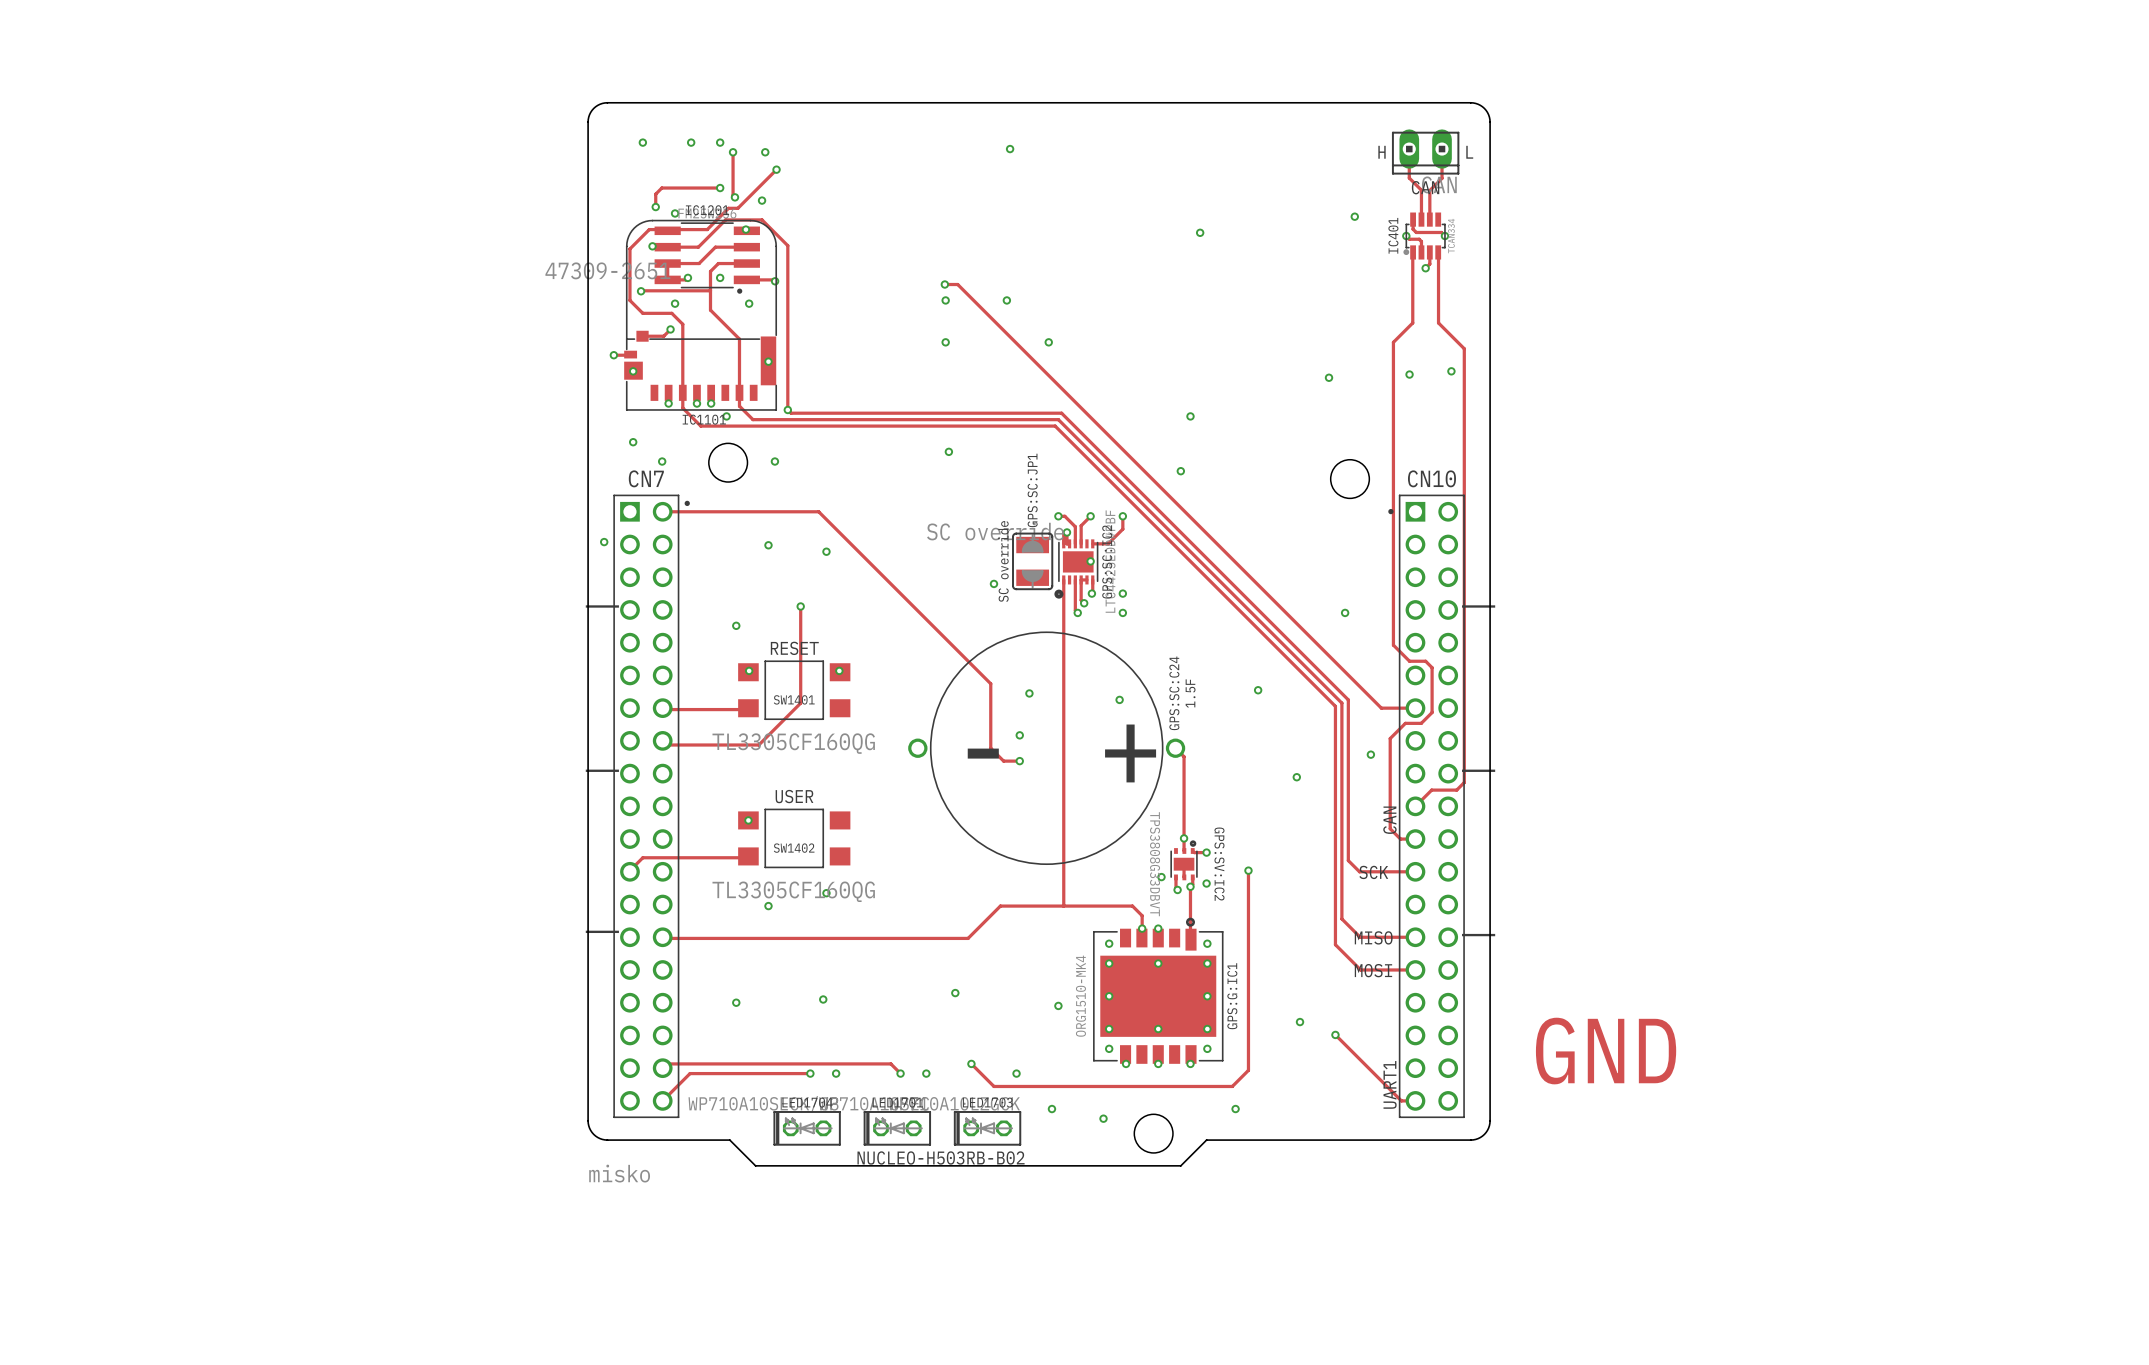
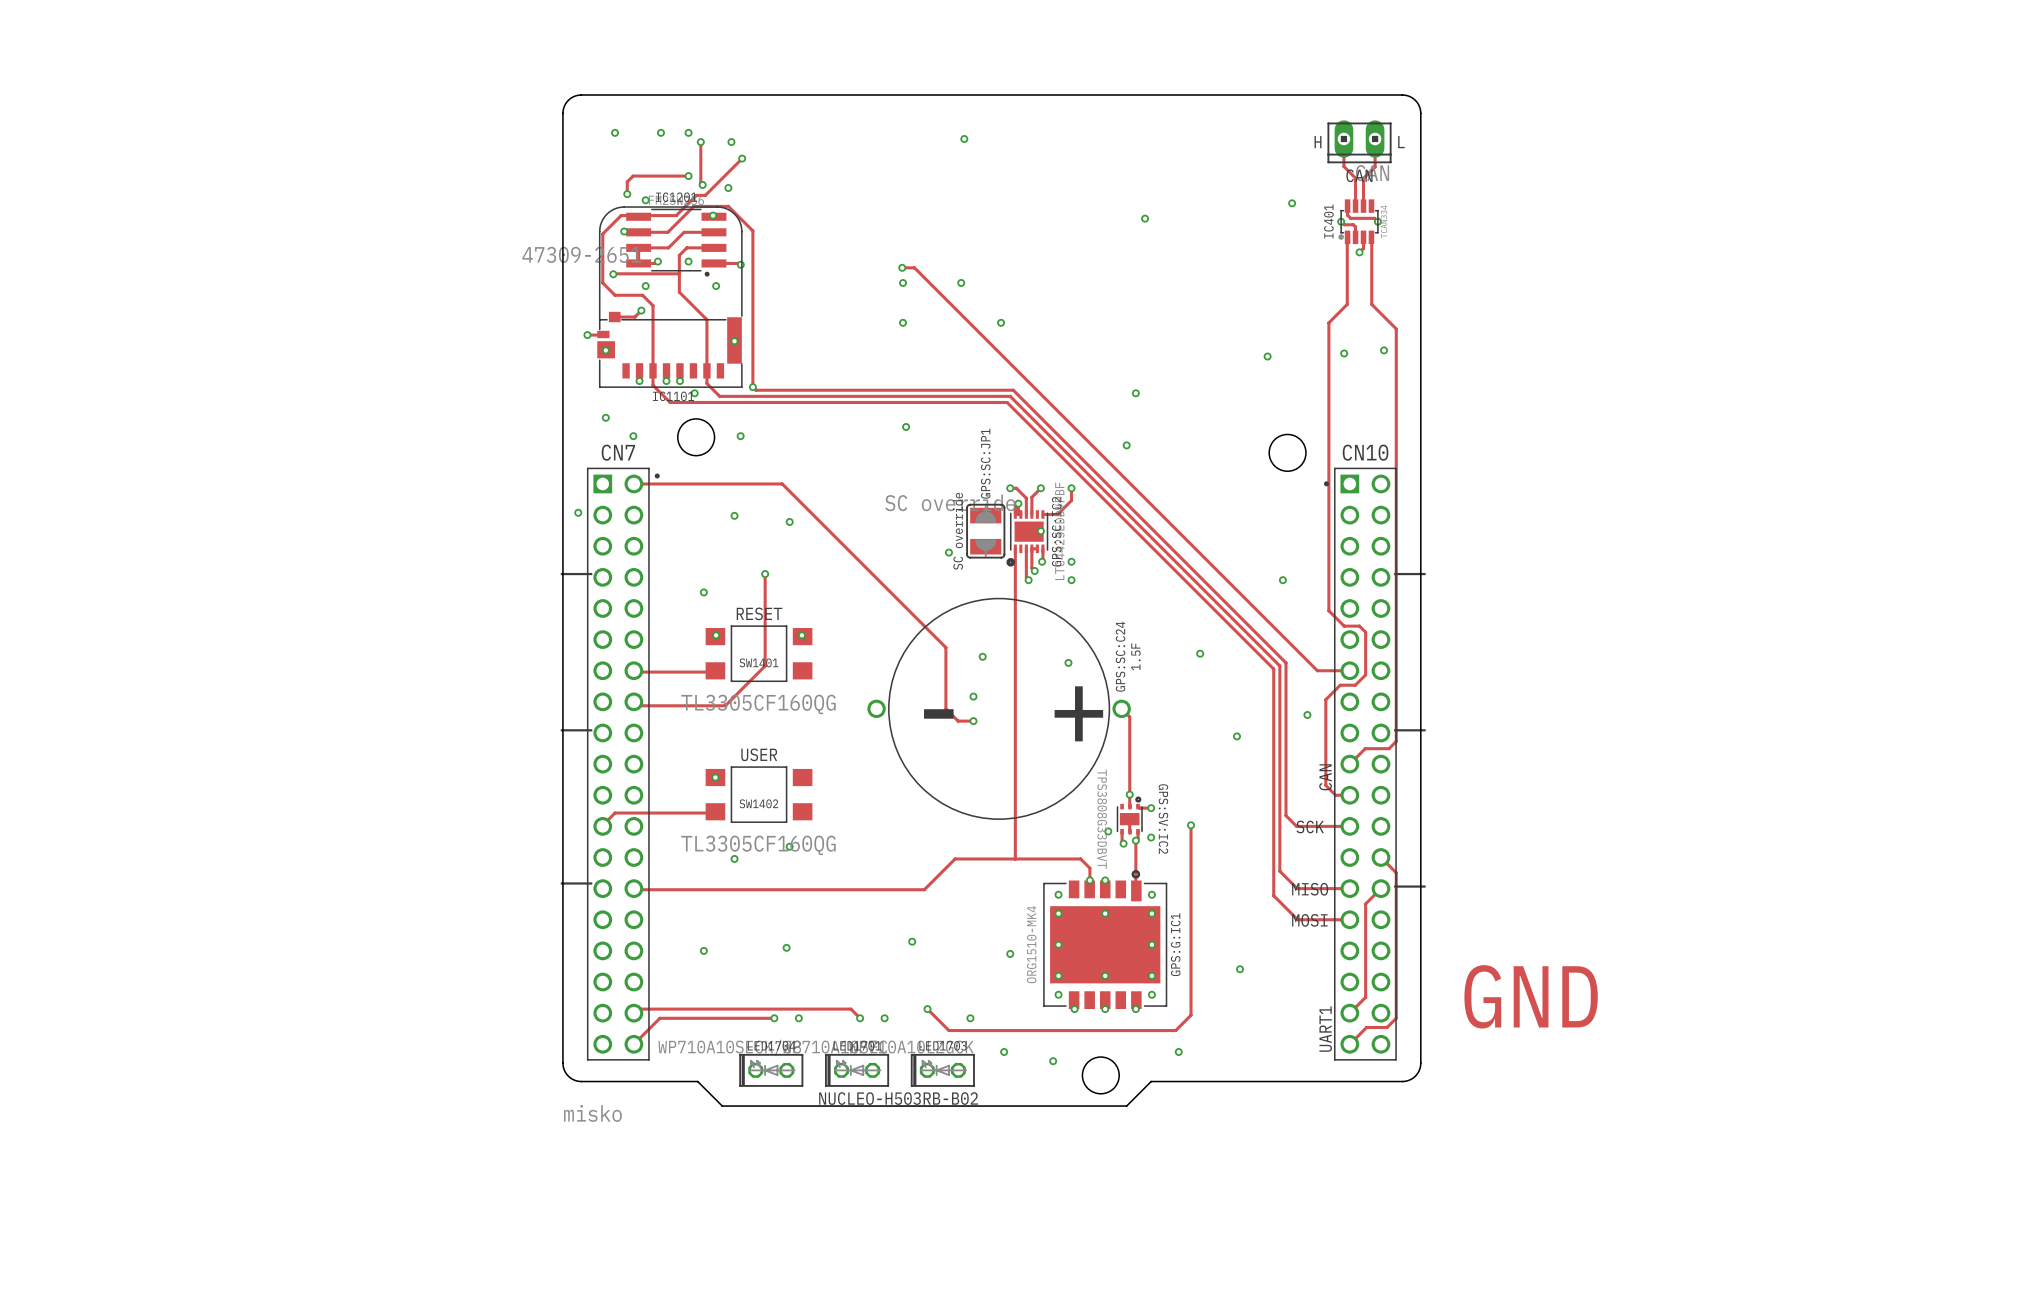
track: none -> (1380, 888) (1365, 903) (1365, 997) (1349, 1013)
track: (1335, 1034) (1401, 1100) (1415, 1100) -> (1380, 857) (1396, 872) (1396, 1018) (1387, 1027) (1366, 1027) (1349, 1044)
via: (1335, 1034) -> none

